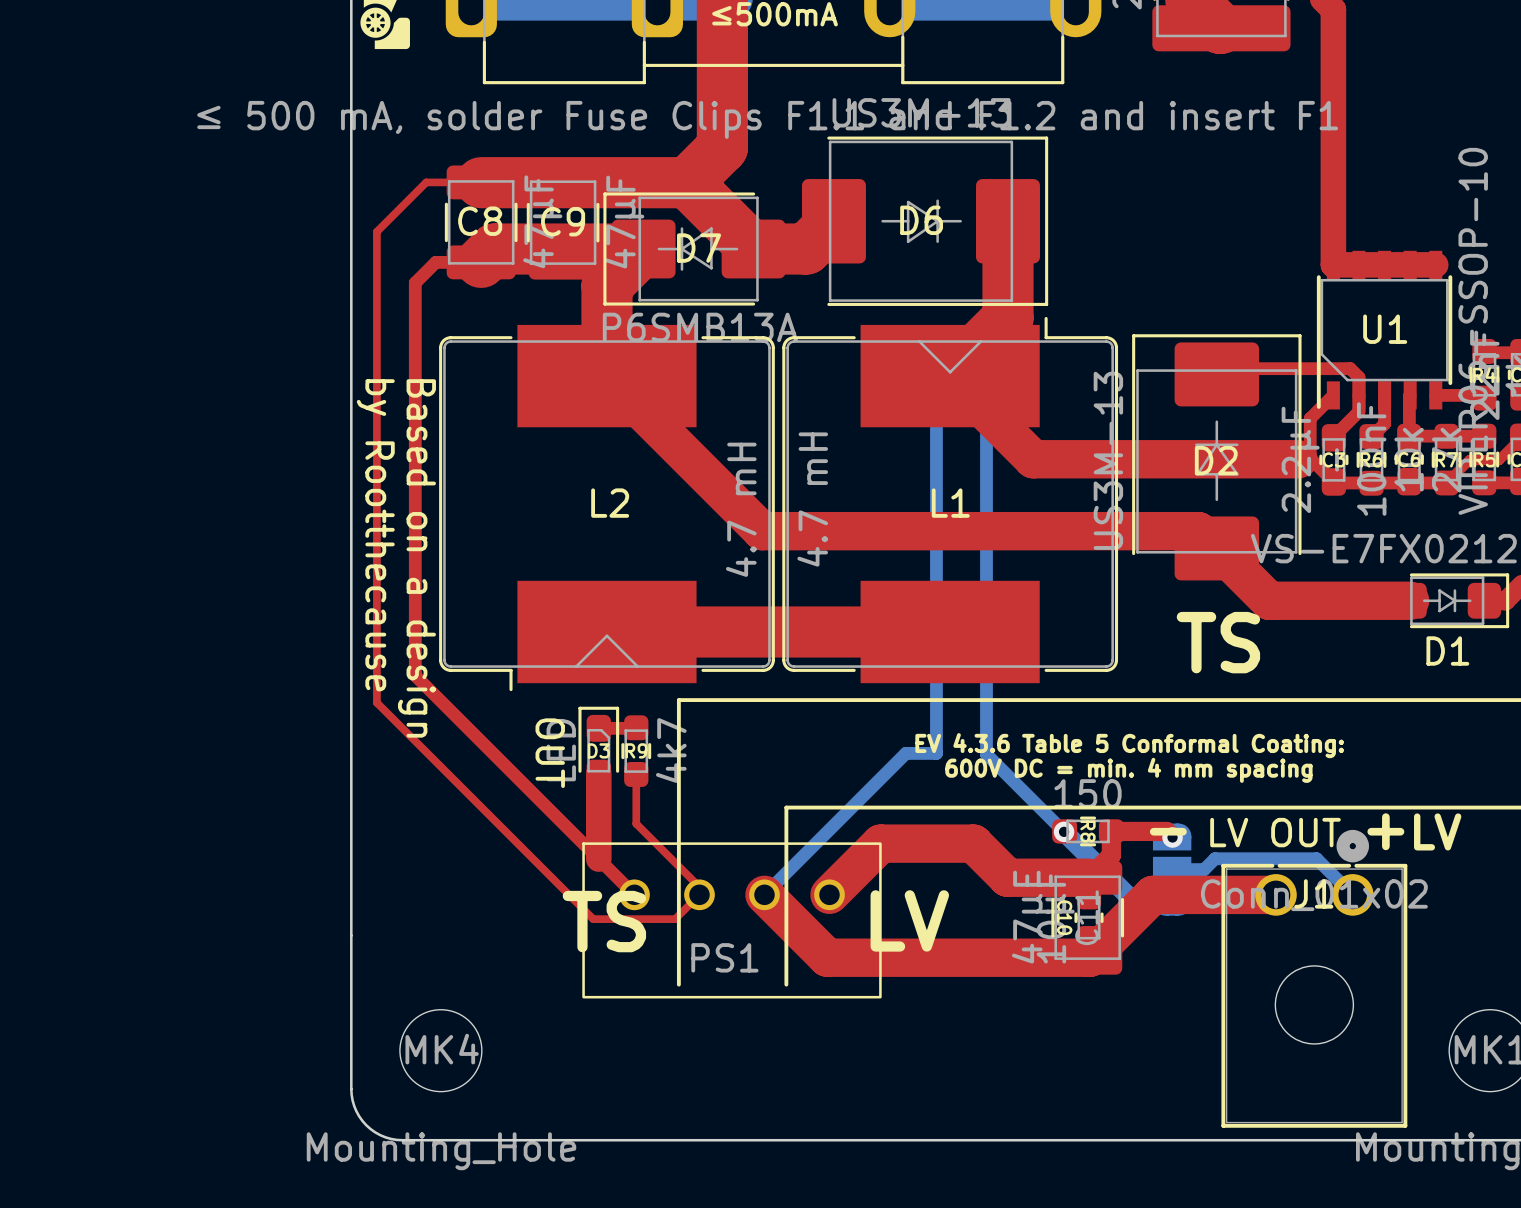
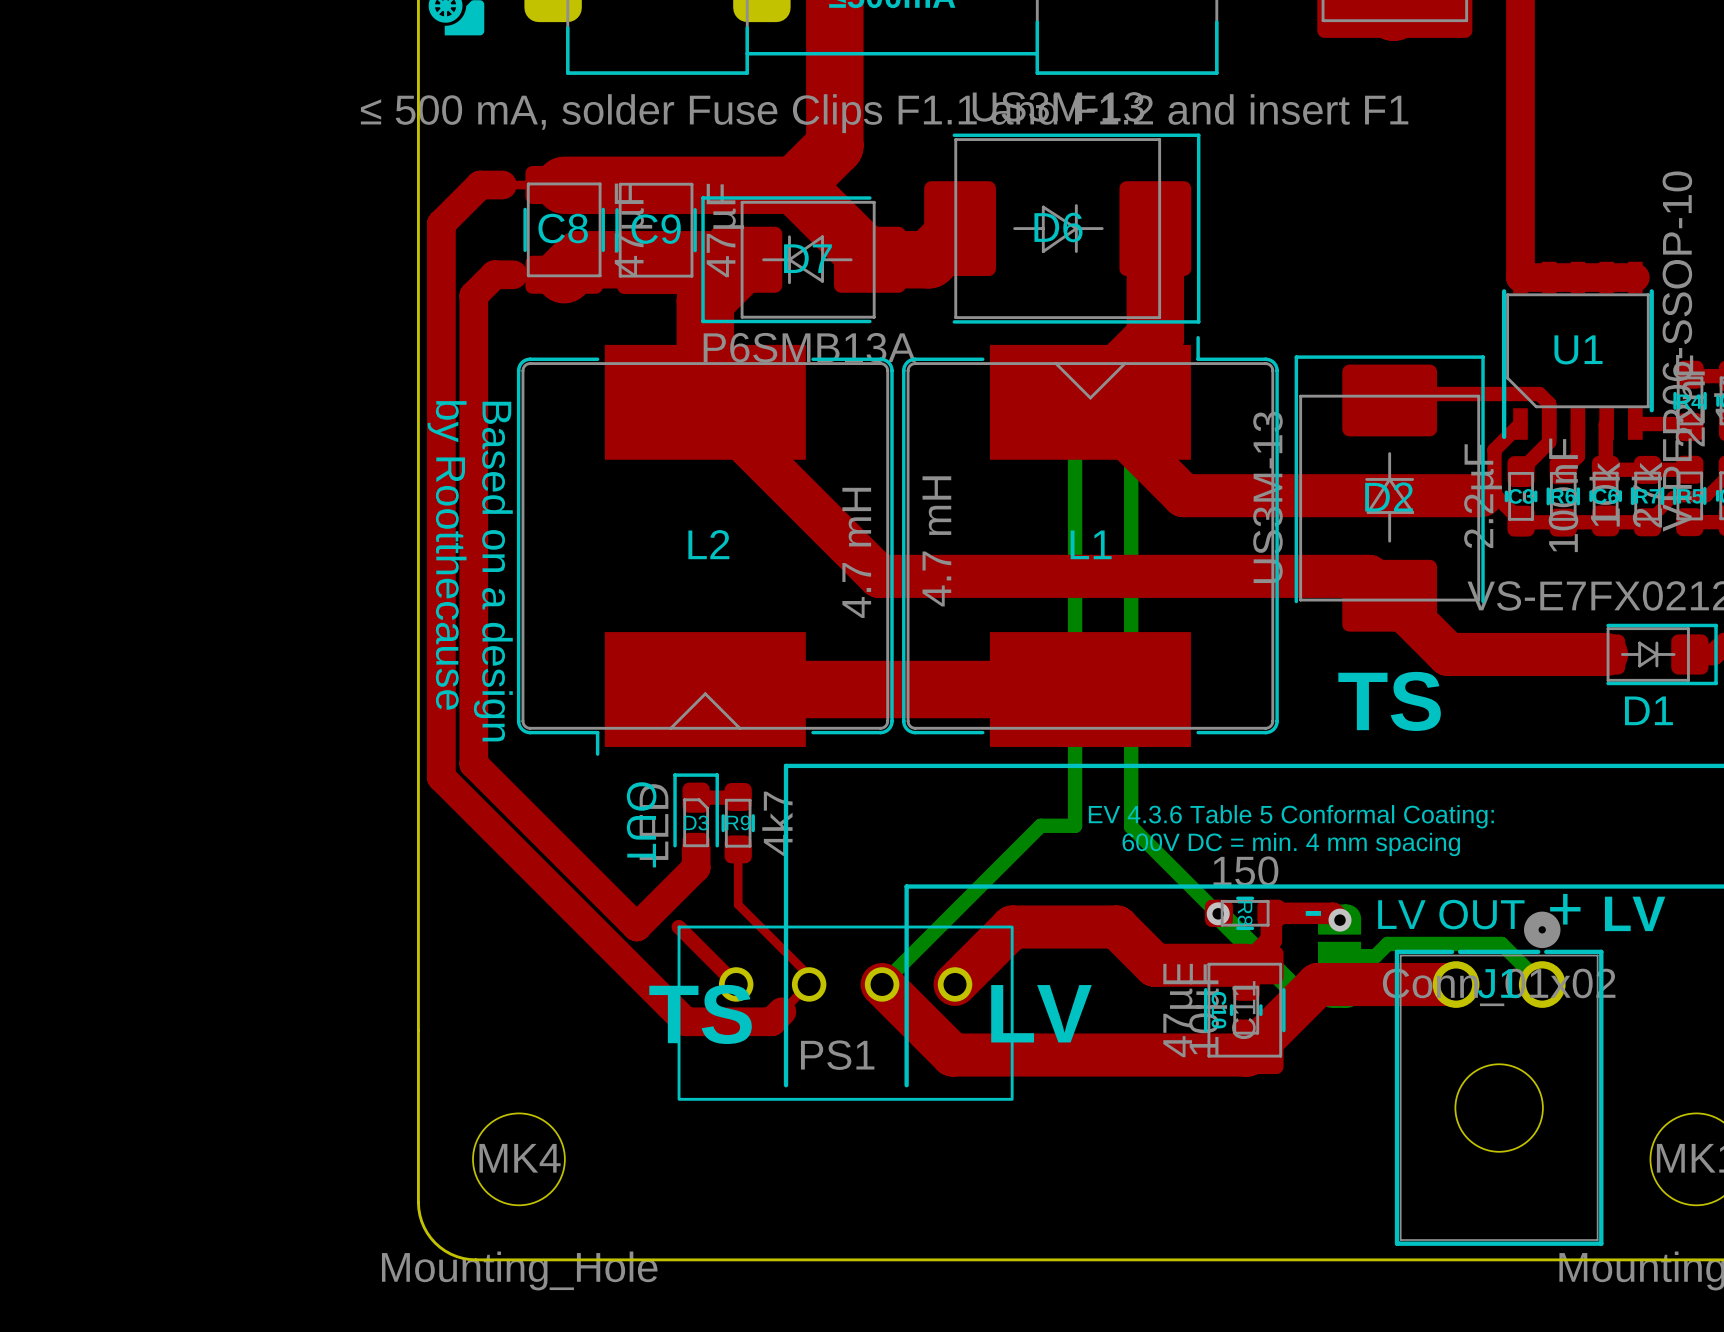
top track: (426, 182) (376, 231) (376, 702) (593, 919) (675, 919) -> (502, 185) (480, 185) (441, 223) (441, 777) (685, 1021) (771, 1021) (781, 1011)
top track: (435, 262) (415, 282) (415, 675) (583, 843) -> (513, 274) (494, 274) (473, 295) (473, 763) (636, 927) (696, 867)
top track: (598, 790) (598, 859) -> none

